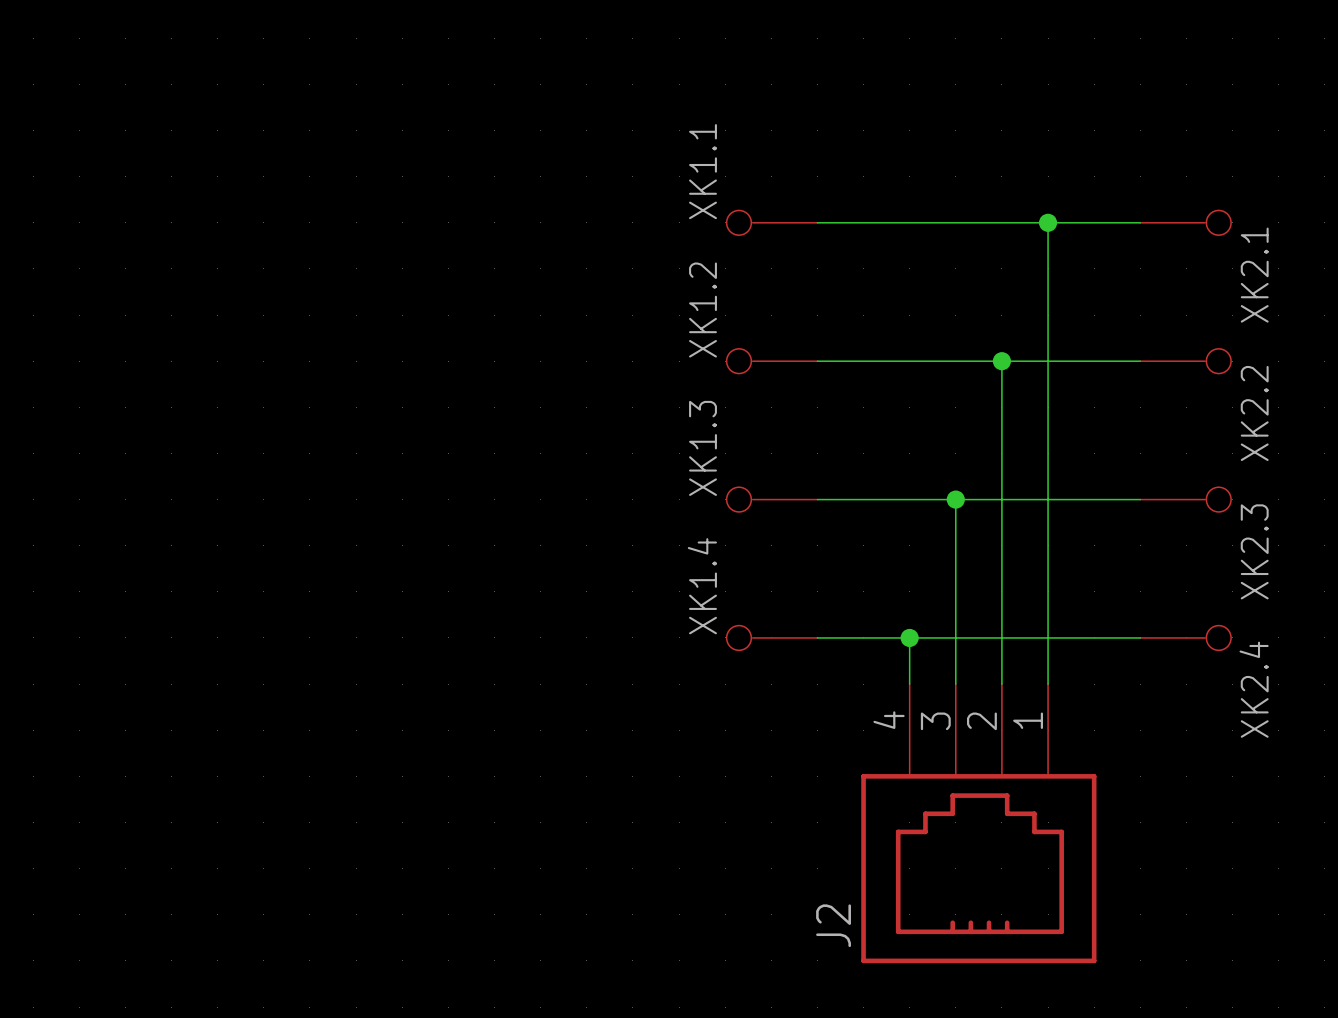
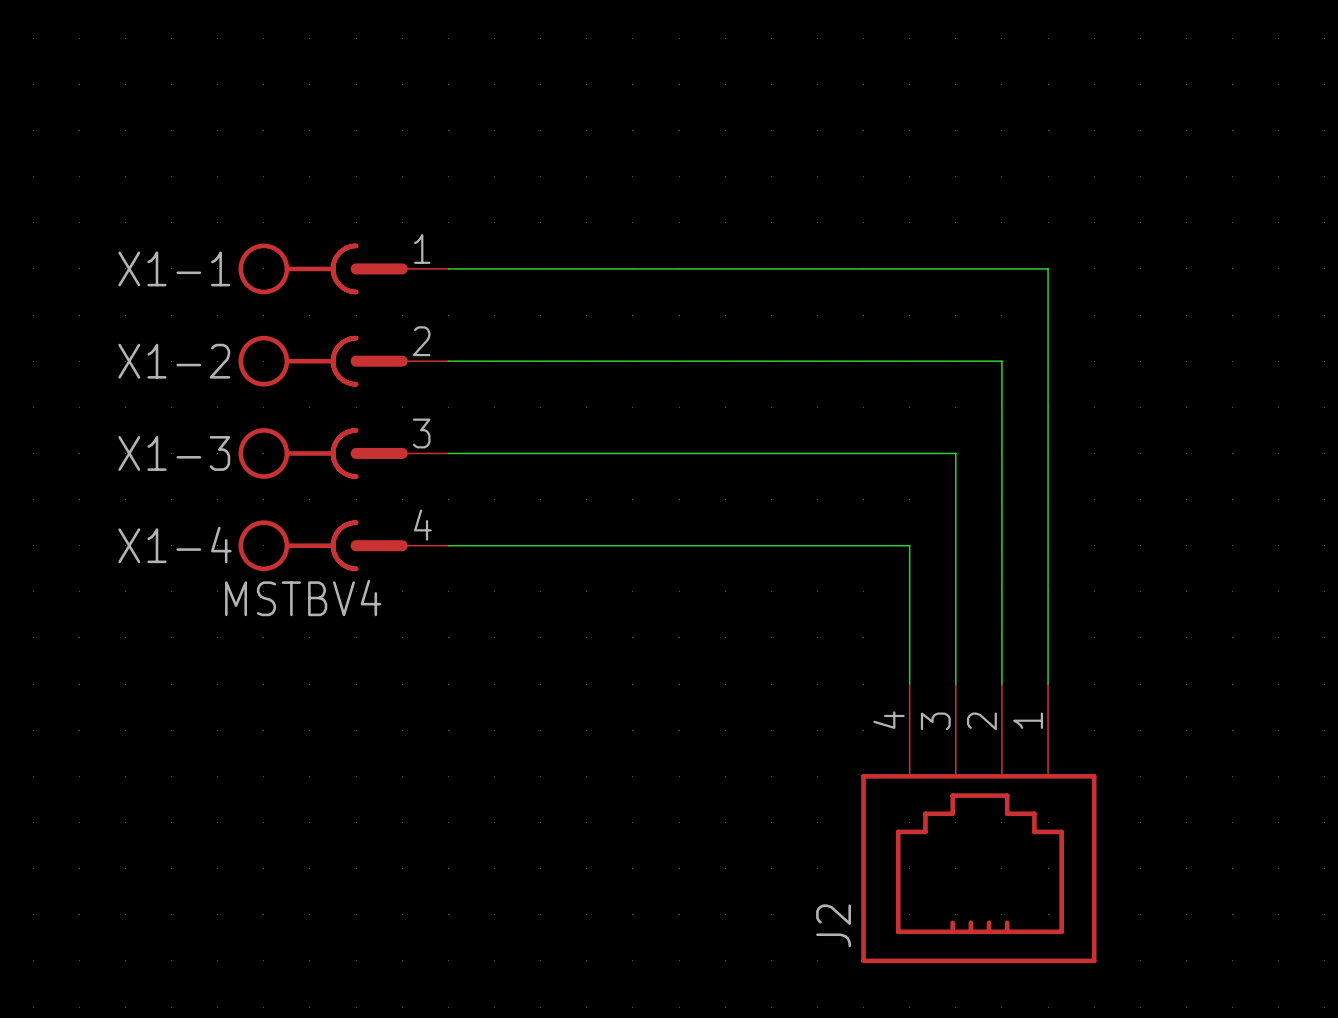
XK1.1: (772, 222) -> none
wire: (817, 222) (1140, 222) -> none
wire: (1048, 222) (1048, 268) -> (448, 268) (1048, 268)
junction: (1048, 222) -> none
XK2.1: (1185, 222) -> none
X1-1: none -> (343, 268)
X1-2: none -> (343, 361)
wire: none -> (448, 361) (817, 361)
XK1.2: (772, 361) -> none
wire: (1001, 361) (1140, 361) -> none
junction: (1001, 361) -> none
XK2.2: (1185, 361) -> none
X1-3: none -> (343, 453)
wire: none -> (448, 453) (955, 453) (955, 499)
XK1.3: (772, 499) -> none
wire: (817, 499) (1140, 499) -> none
junction: (955, 499) -> none
XK2.3: (1185, 499) -> none
X1-4: none -> MSTBV4 (343, 545)
wire: none -> (448, 545) (909, 545) (909, 637)
XK1.4: (772, 637) -> none
wire: (817, 637) (1140, 637) -> none
junction: (909, 637) -> none
XK2.4: (1185, 637) -> none

